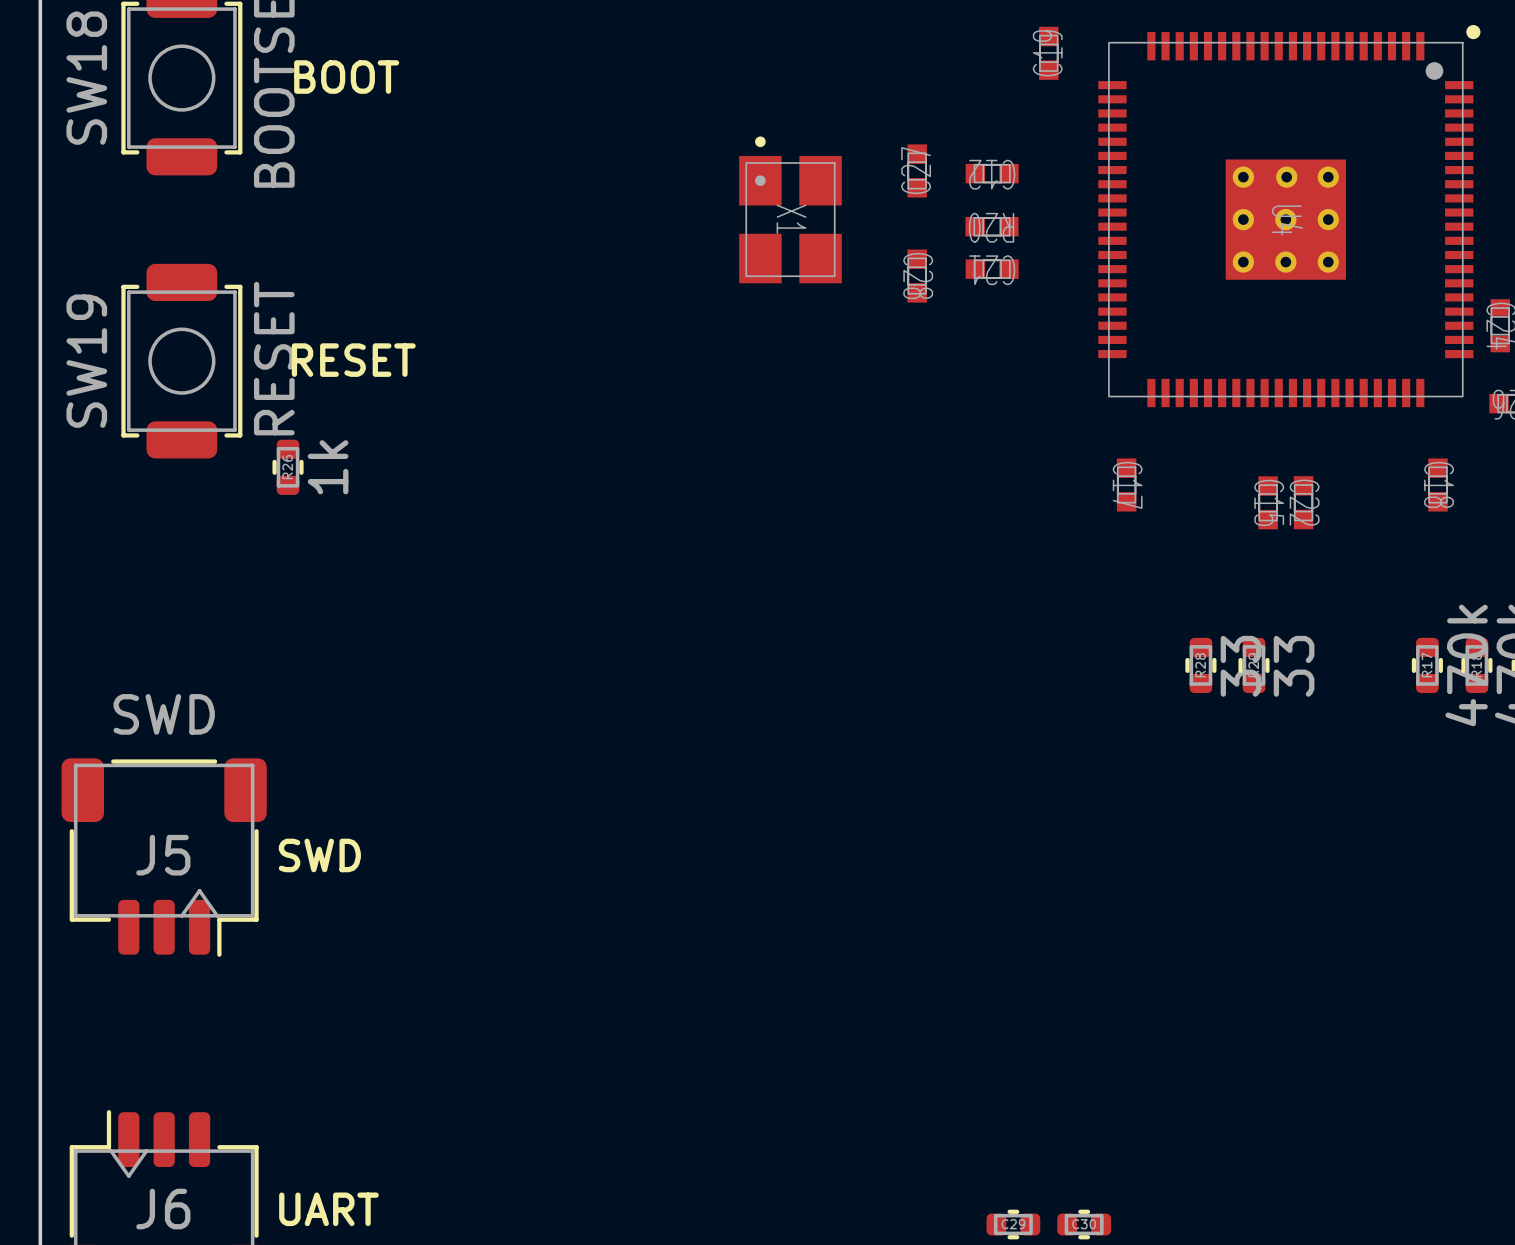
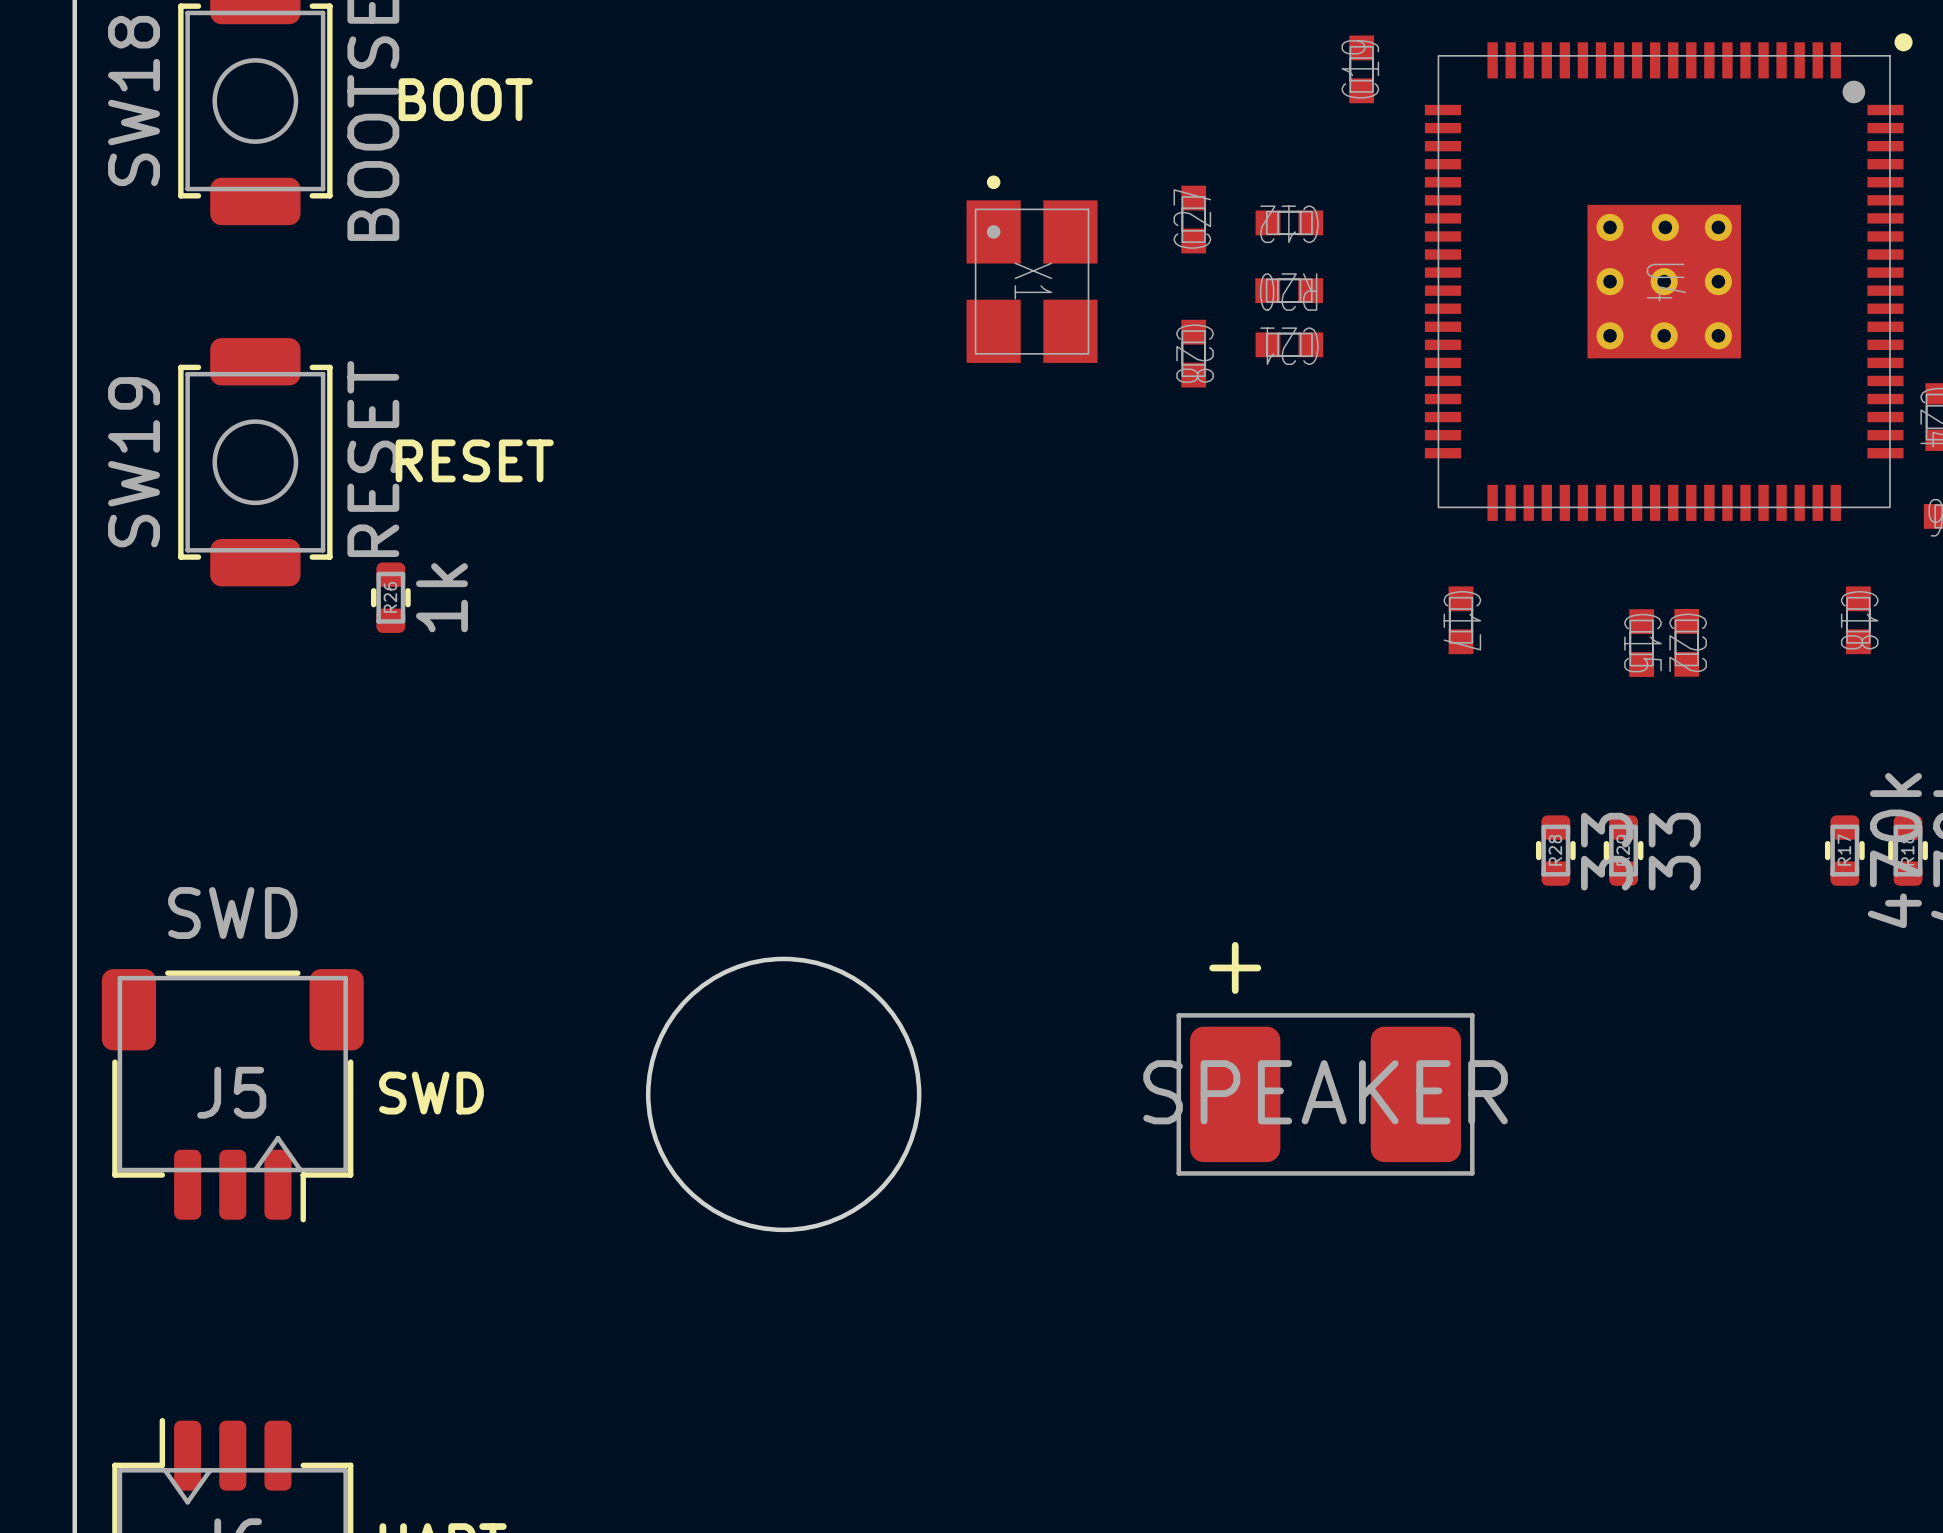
round board edge: none -> [645, 956, 922, 1233]
part: none -> SPEAKER (1325, 1058)

